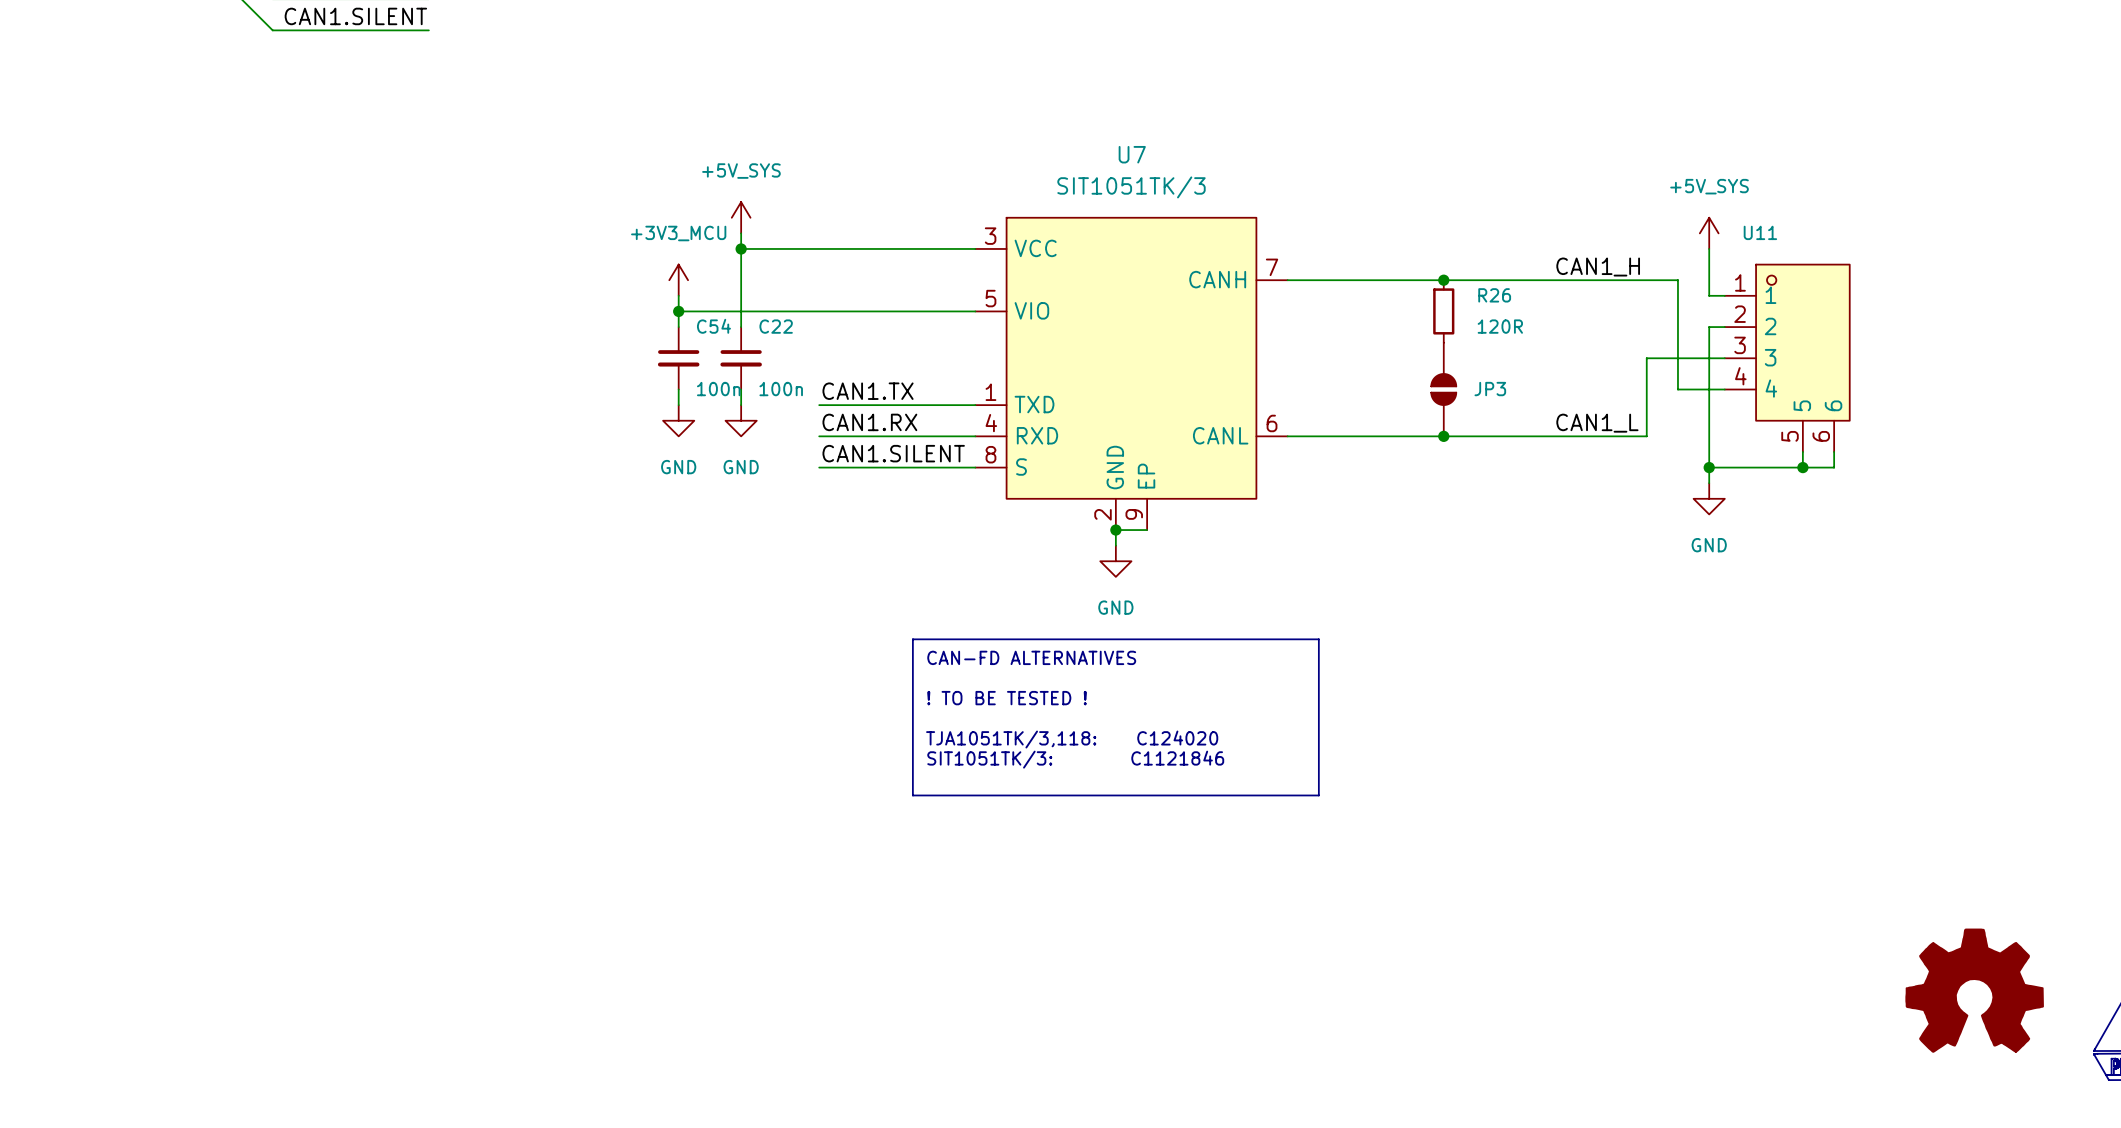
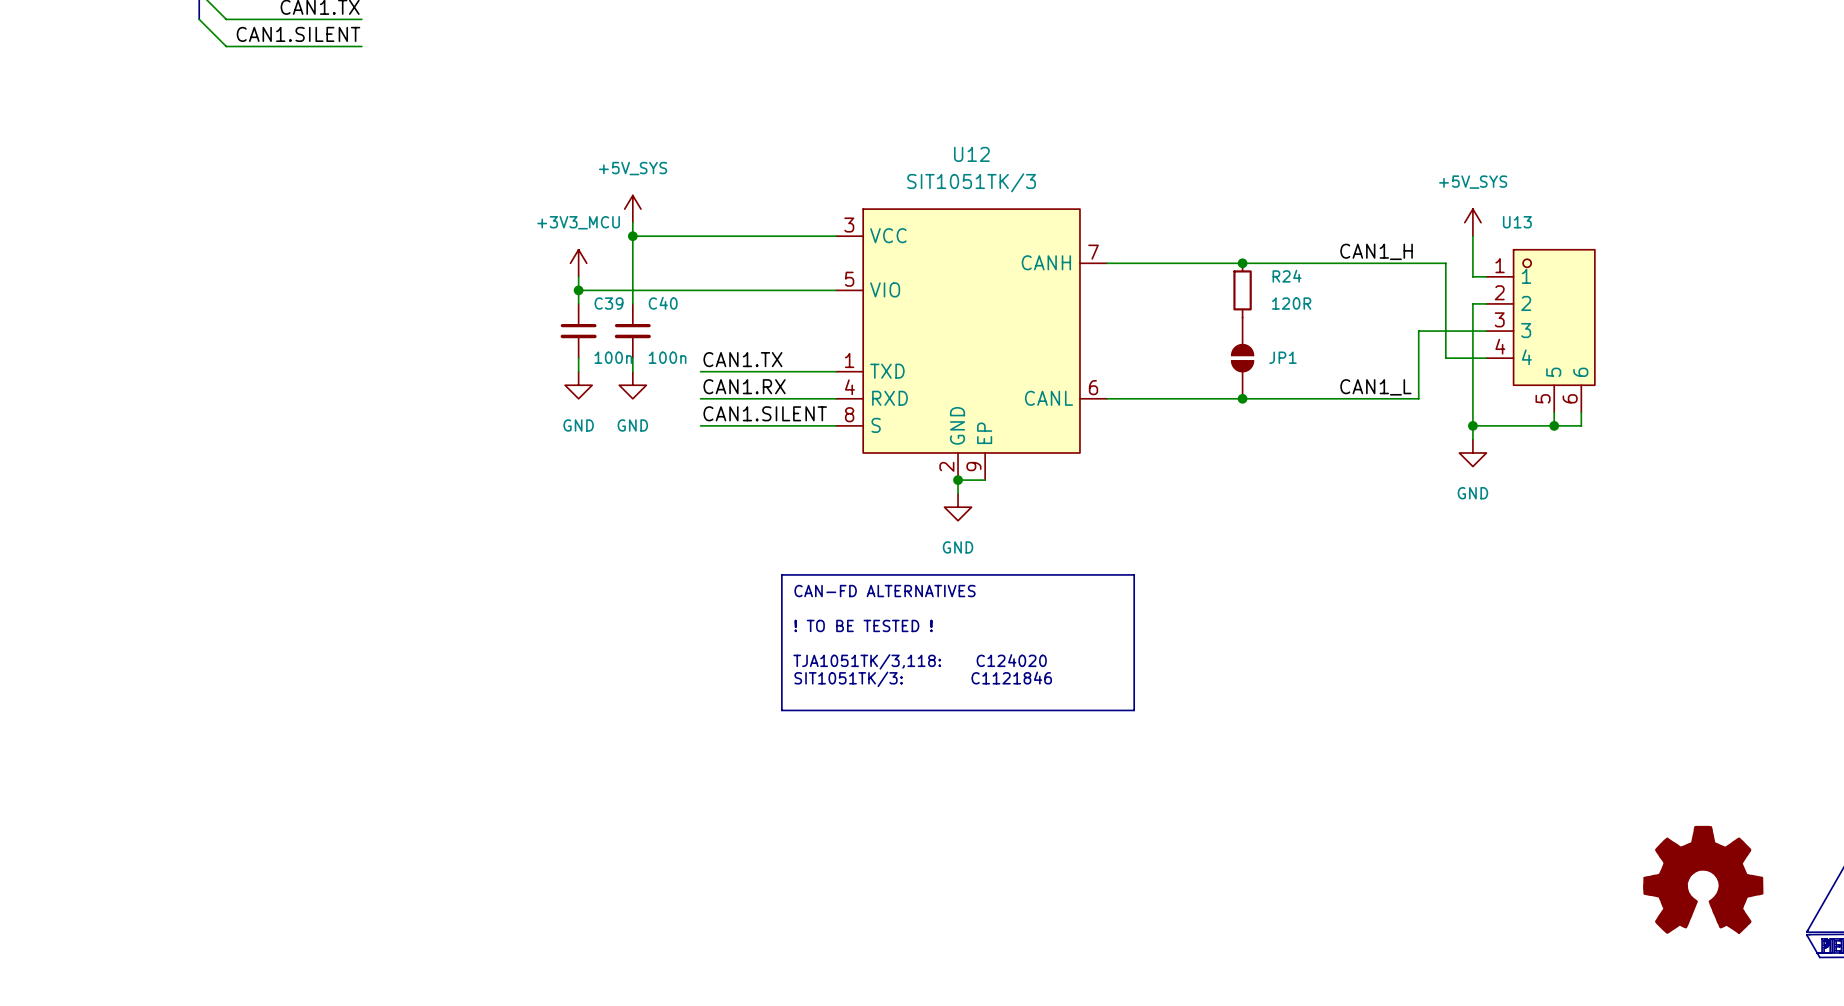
U7 name: U7 (1132, 154) -> U12 (971, 154)
U11 name: U11 (1760, 232) -> U13 (1517, 222)
R26 name: R26 (1494, 295) -> R24 (1287, 276)
C54 name: C54 (713, 326) -> C39 (608, 303)
C22 name: C22 (776, 326) -> C40 (663, 303)
JP3 name: JP3 (1490, 389) -> JP1 (1282, 357)

